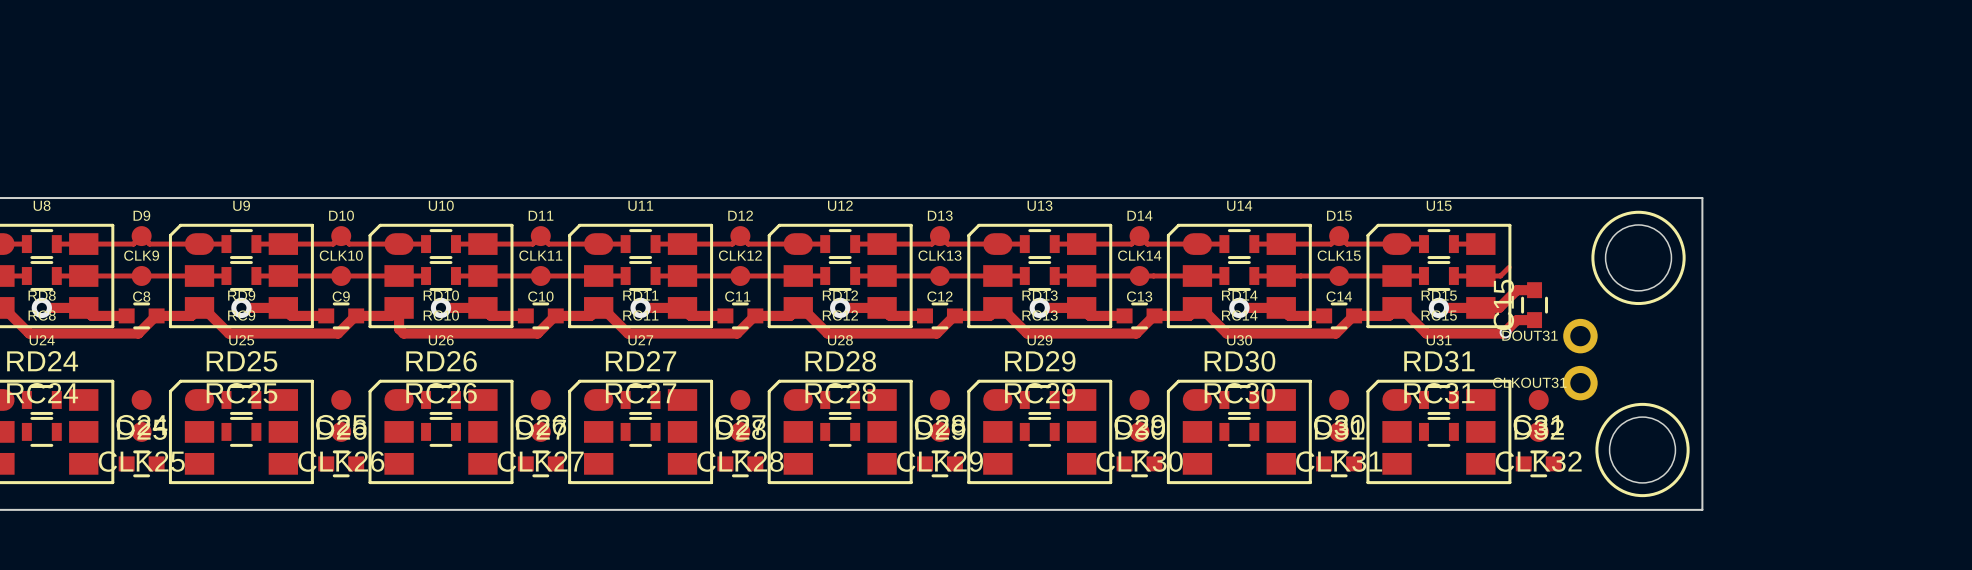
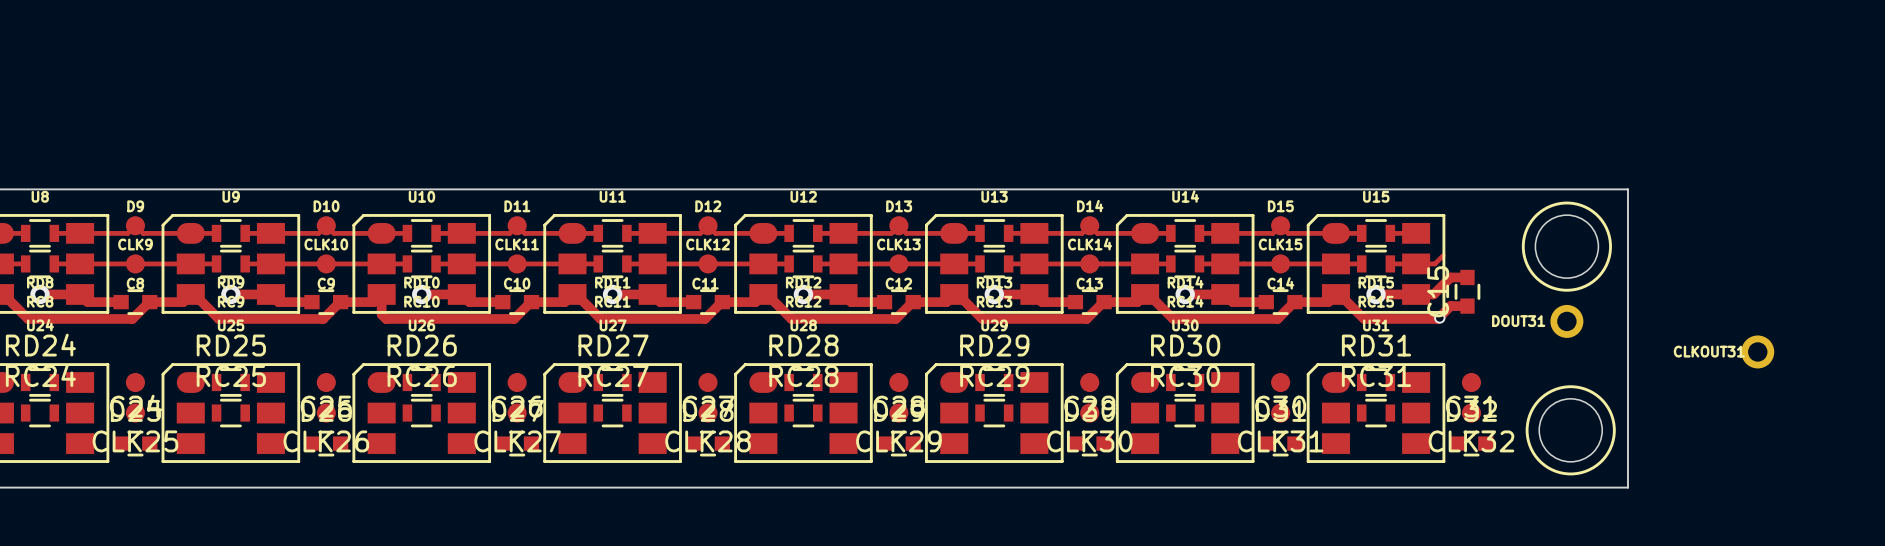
DOUT31 position: (1580, 336) -> (1566, 321)
CLKOUT31 position: (1580, 383) -> (1757, 351)

